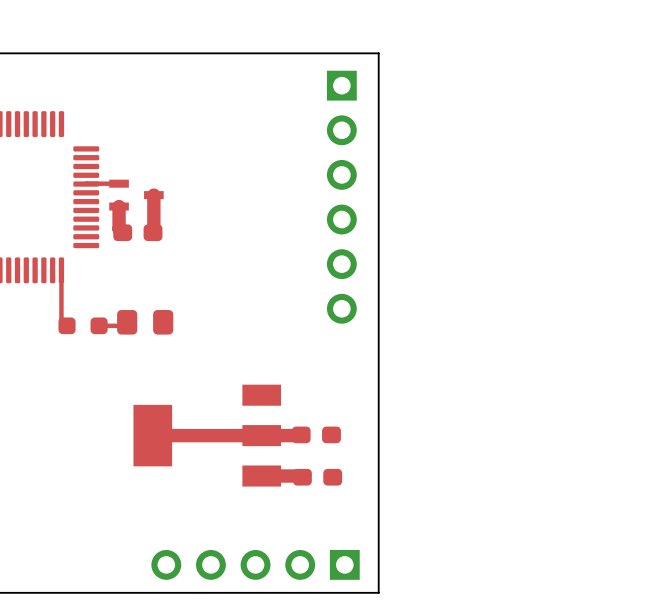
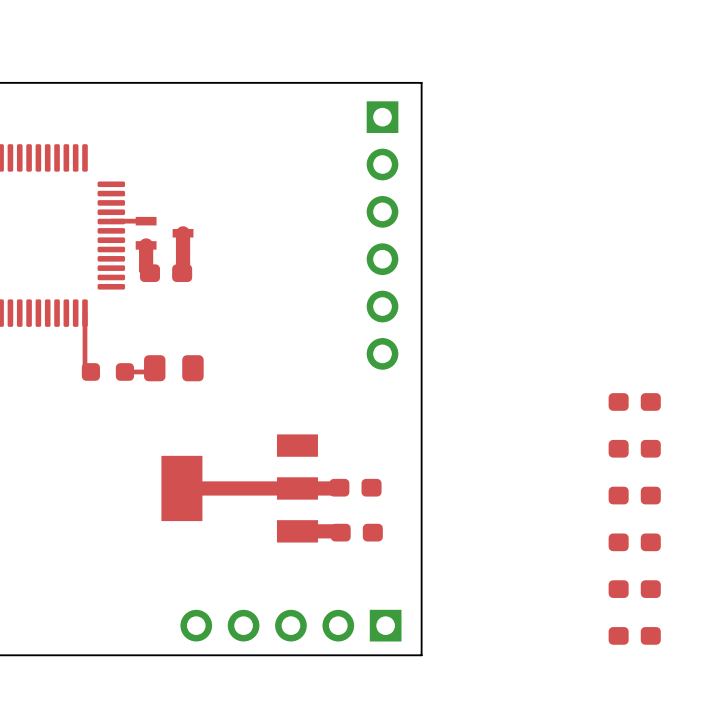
part: none -> (634, 401)
part: none -> (634, 448)
part: none -> (634, 495)
part: none -> (634, 542)
part: none -> (634, 589)
part: none -> (634, 635)

